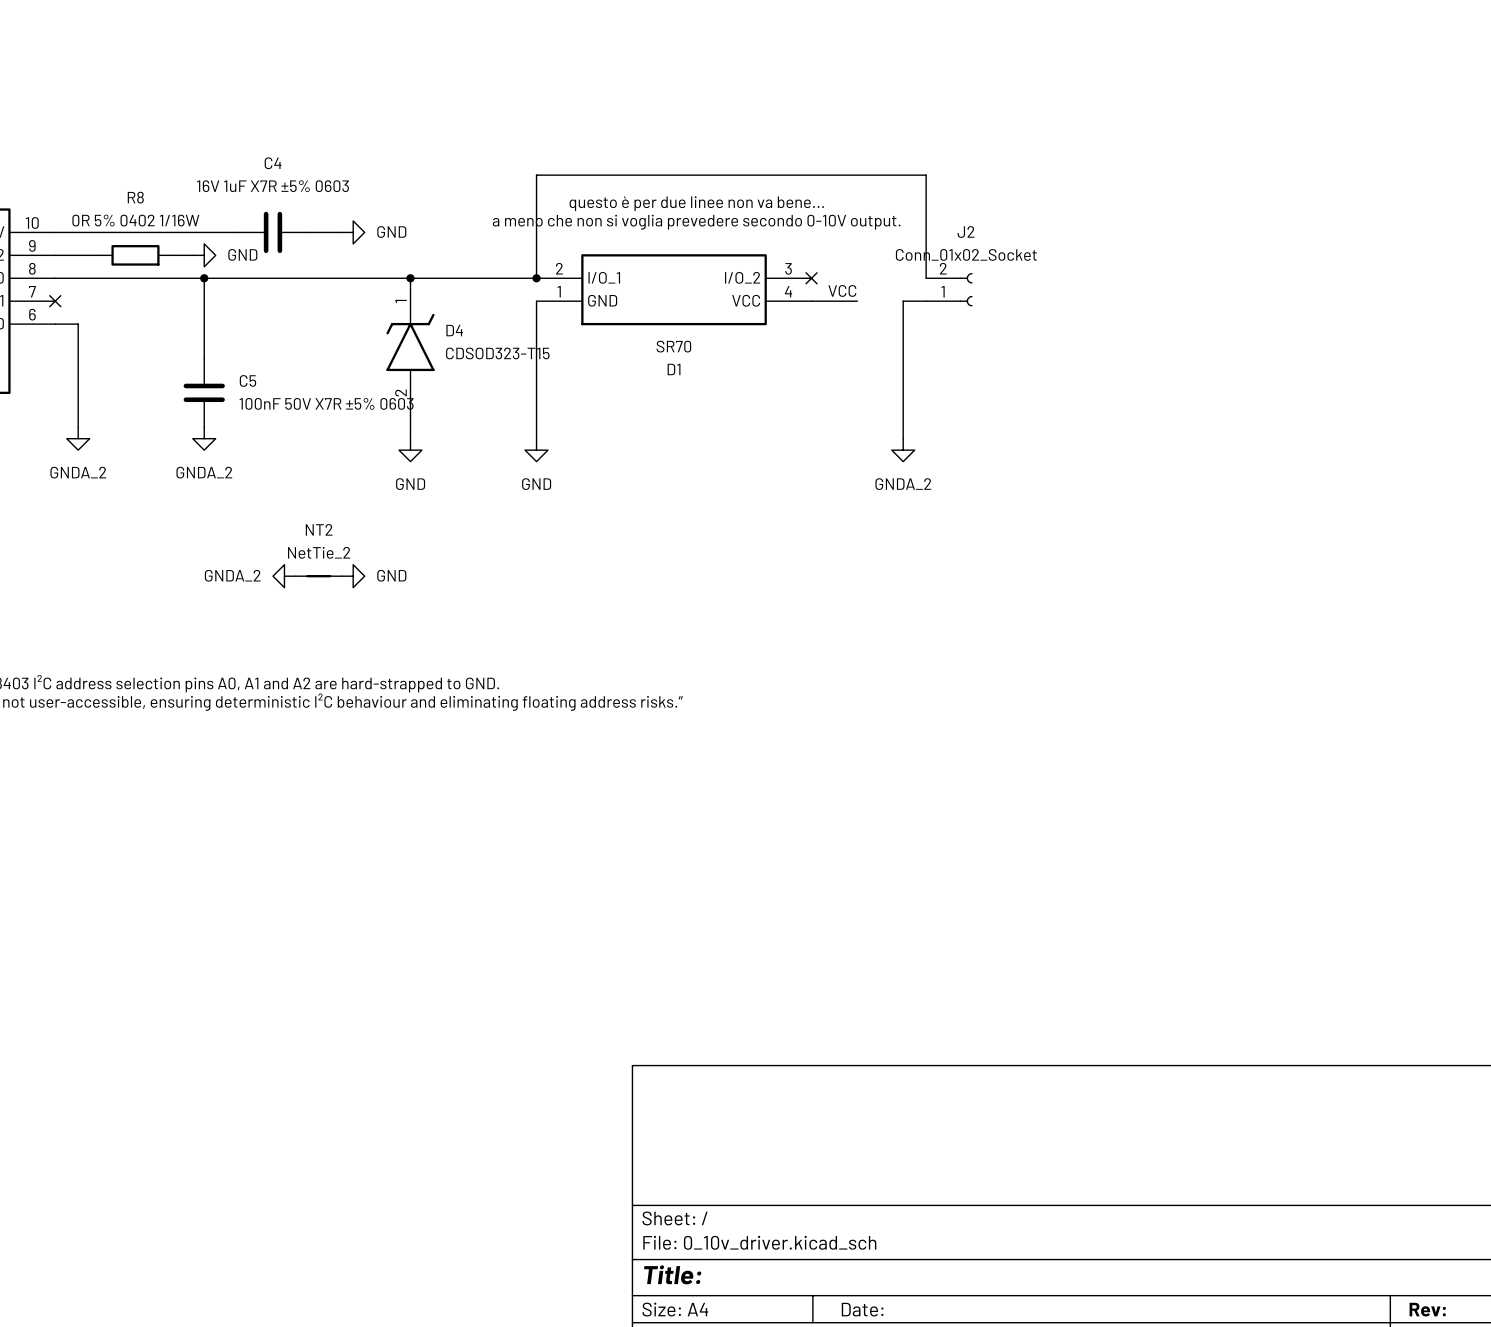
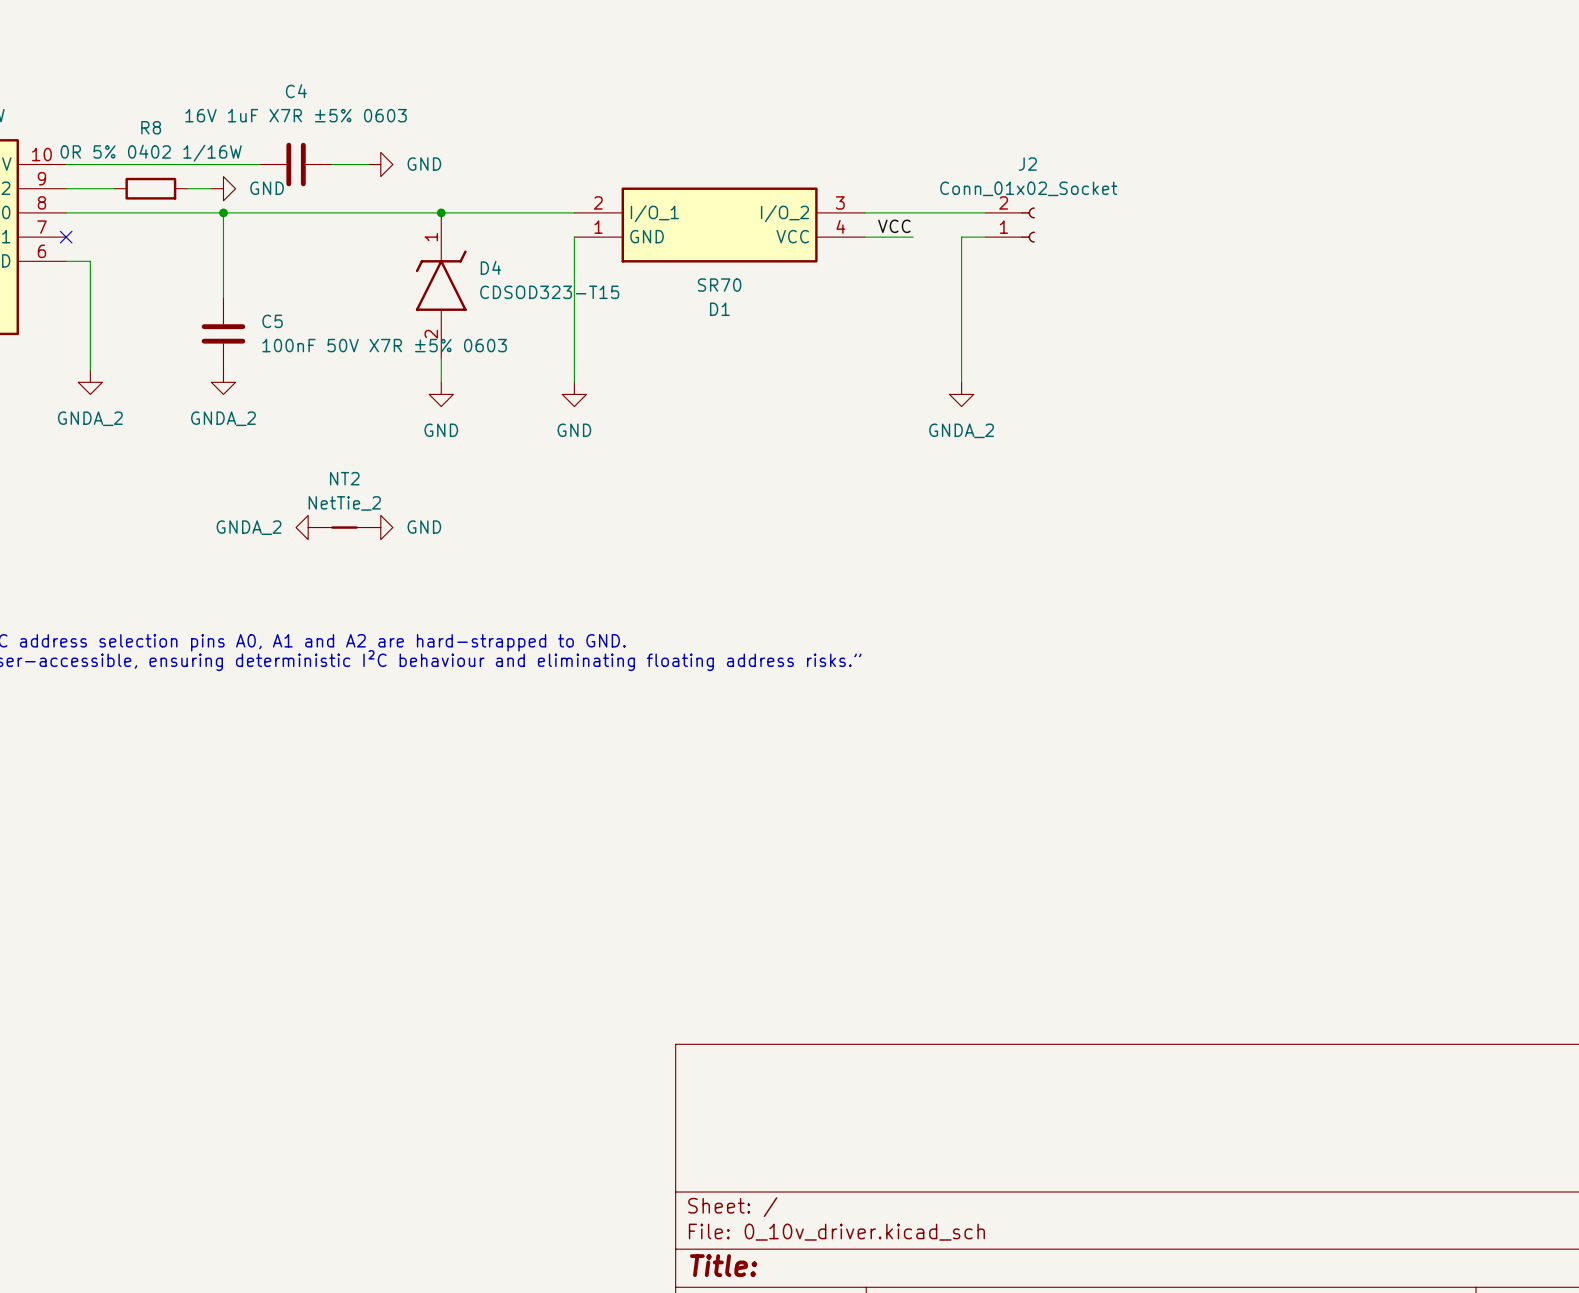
text: questo è per due linee non va bene... (696, 203) -> none
text: a meno che non si voglia prevedere secondo 0-10V output. (696, 222) -> none
wire: (536, 278) (536, 175) (926, 175) (926, 278) -> (864, 212) (985, 212)
junction: (536, 278) -> none
no-connect mark: (811, 278) -> none

